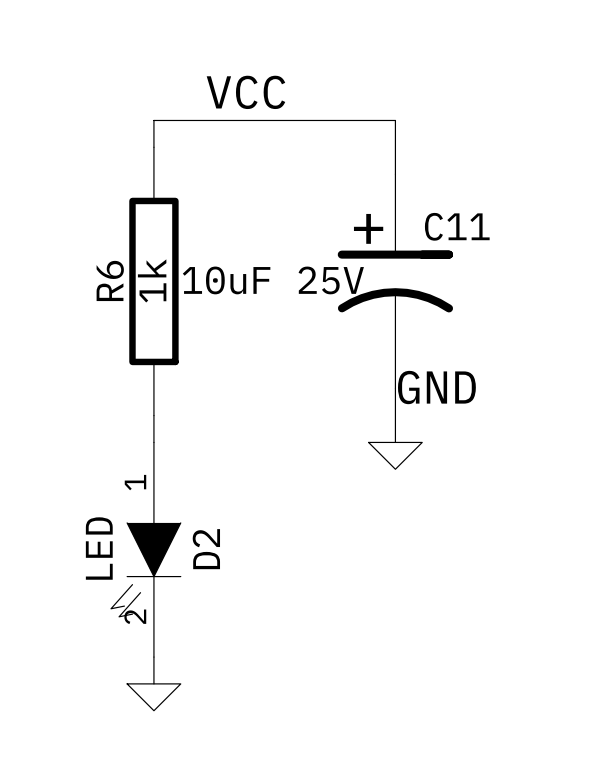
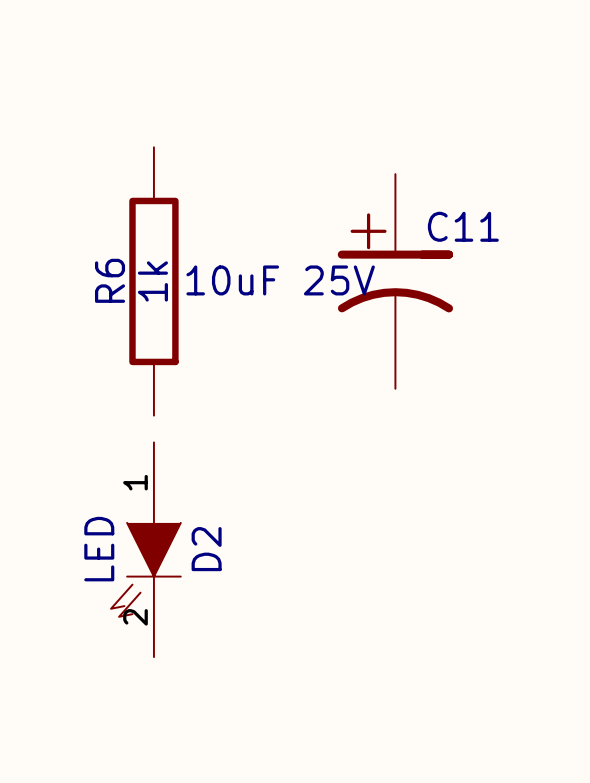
label: VCC (245, 92) -> none
wire: (153, 147) (153, 120) (395, 120) (395, 174) -> none
label: GND (436, 387) -> none
wire: (395, 388) (395, 442) -> none
wire: (153, 415) (153, 442) -> none
power symbol: (395, 455) -> none
wire: (153, 657) (153, 683) -> none
power symbol: (153, 697) -> none

